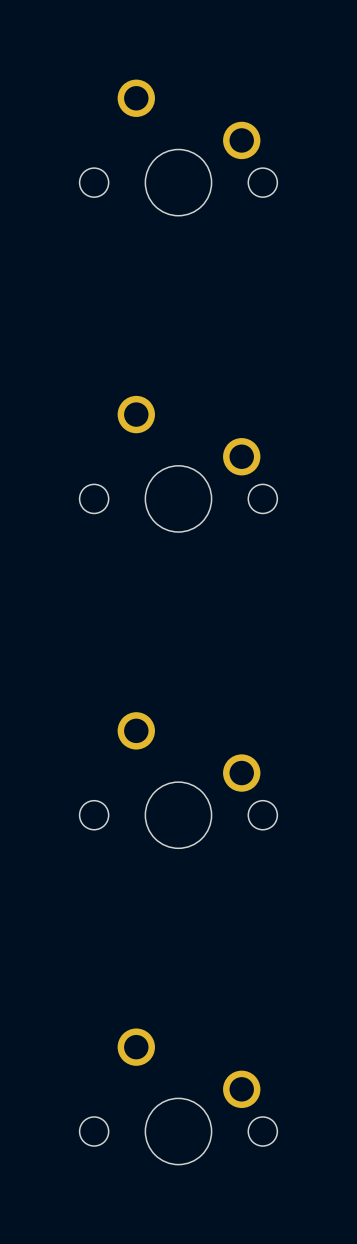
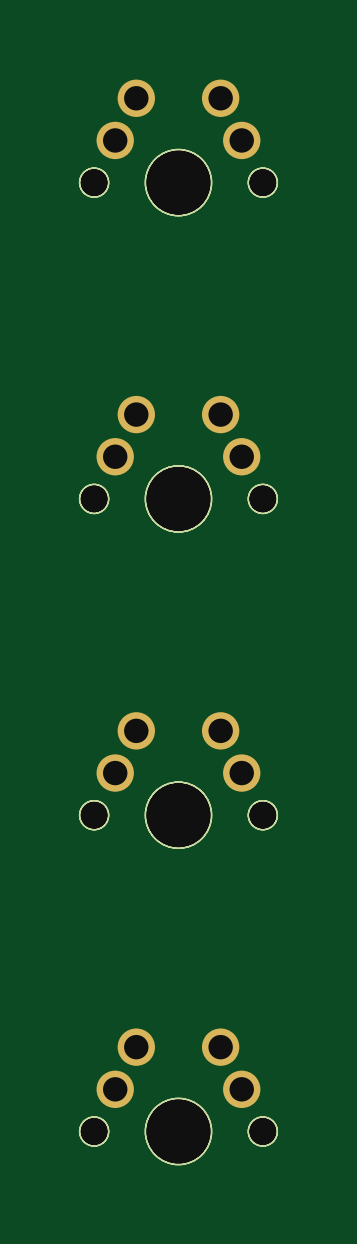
part: none -> (178, 147)
part: none -> (178, 463)
part: none -> (178, 780)
part: none -> (178, 1096)

